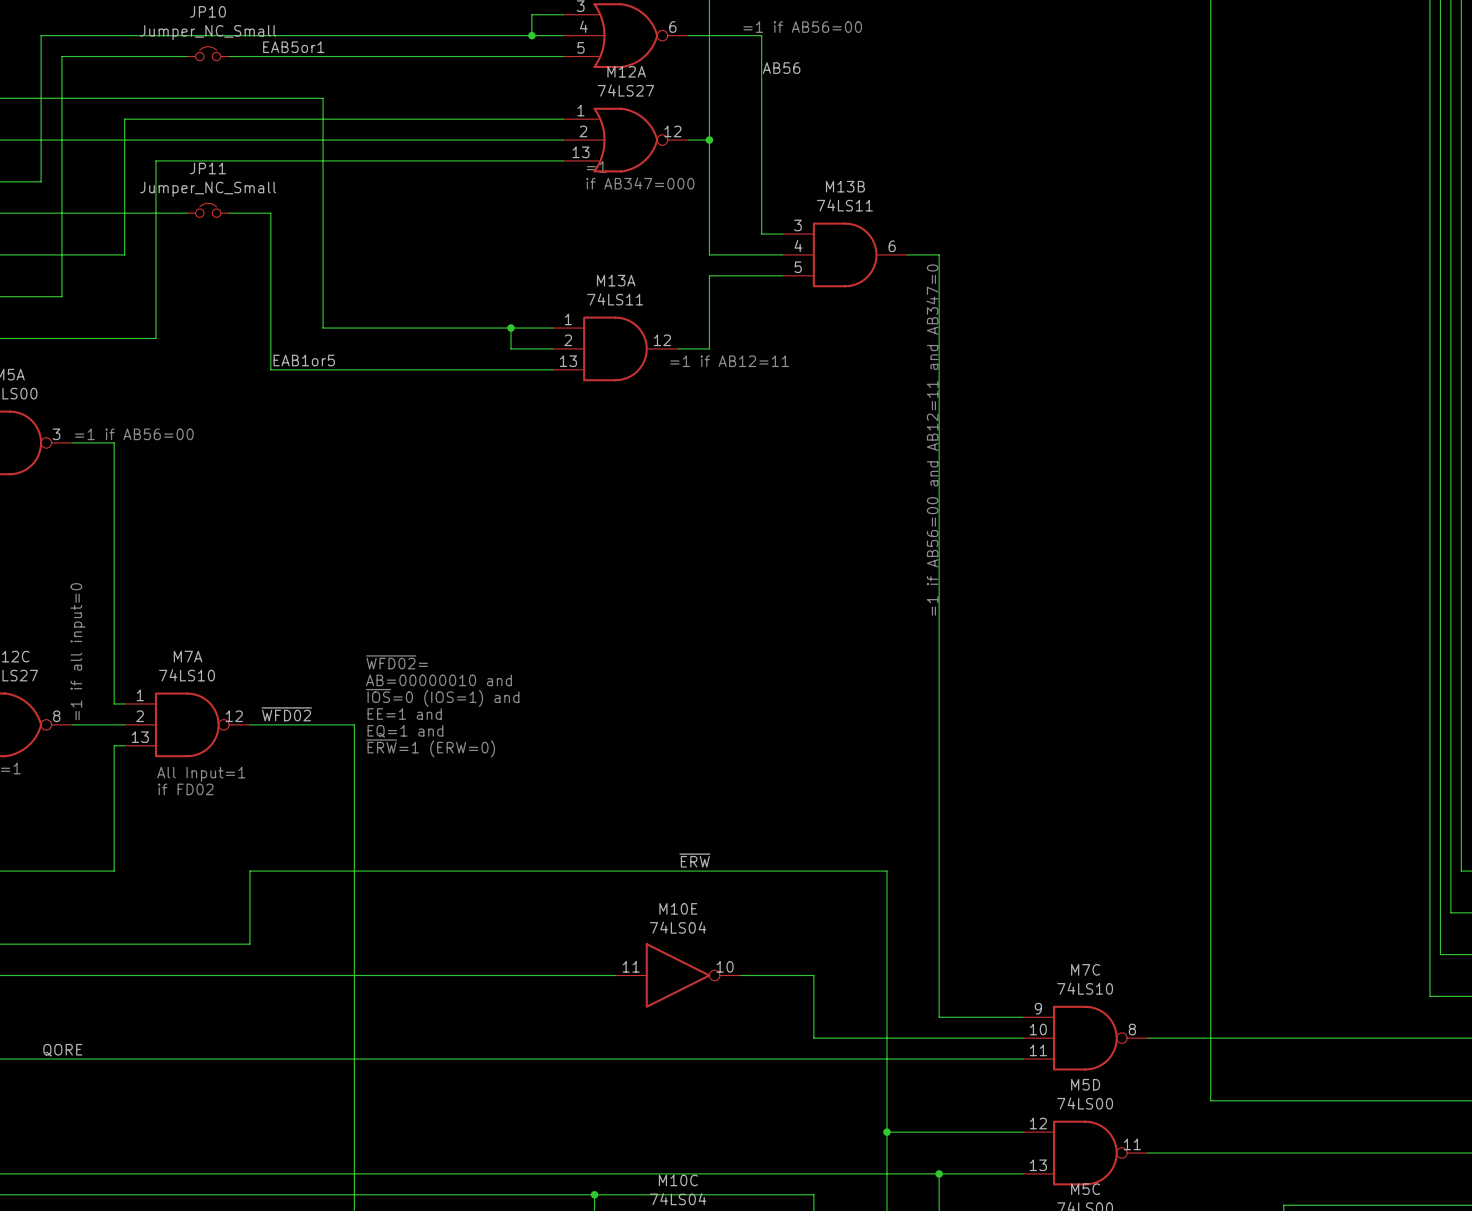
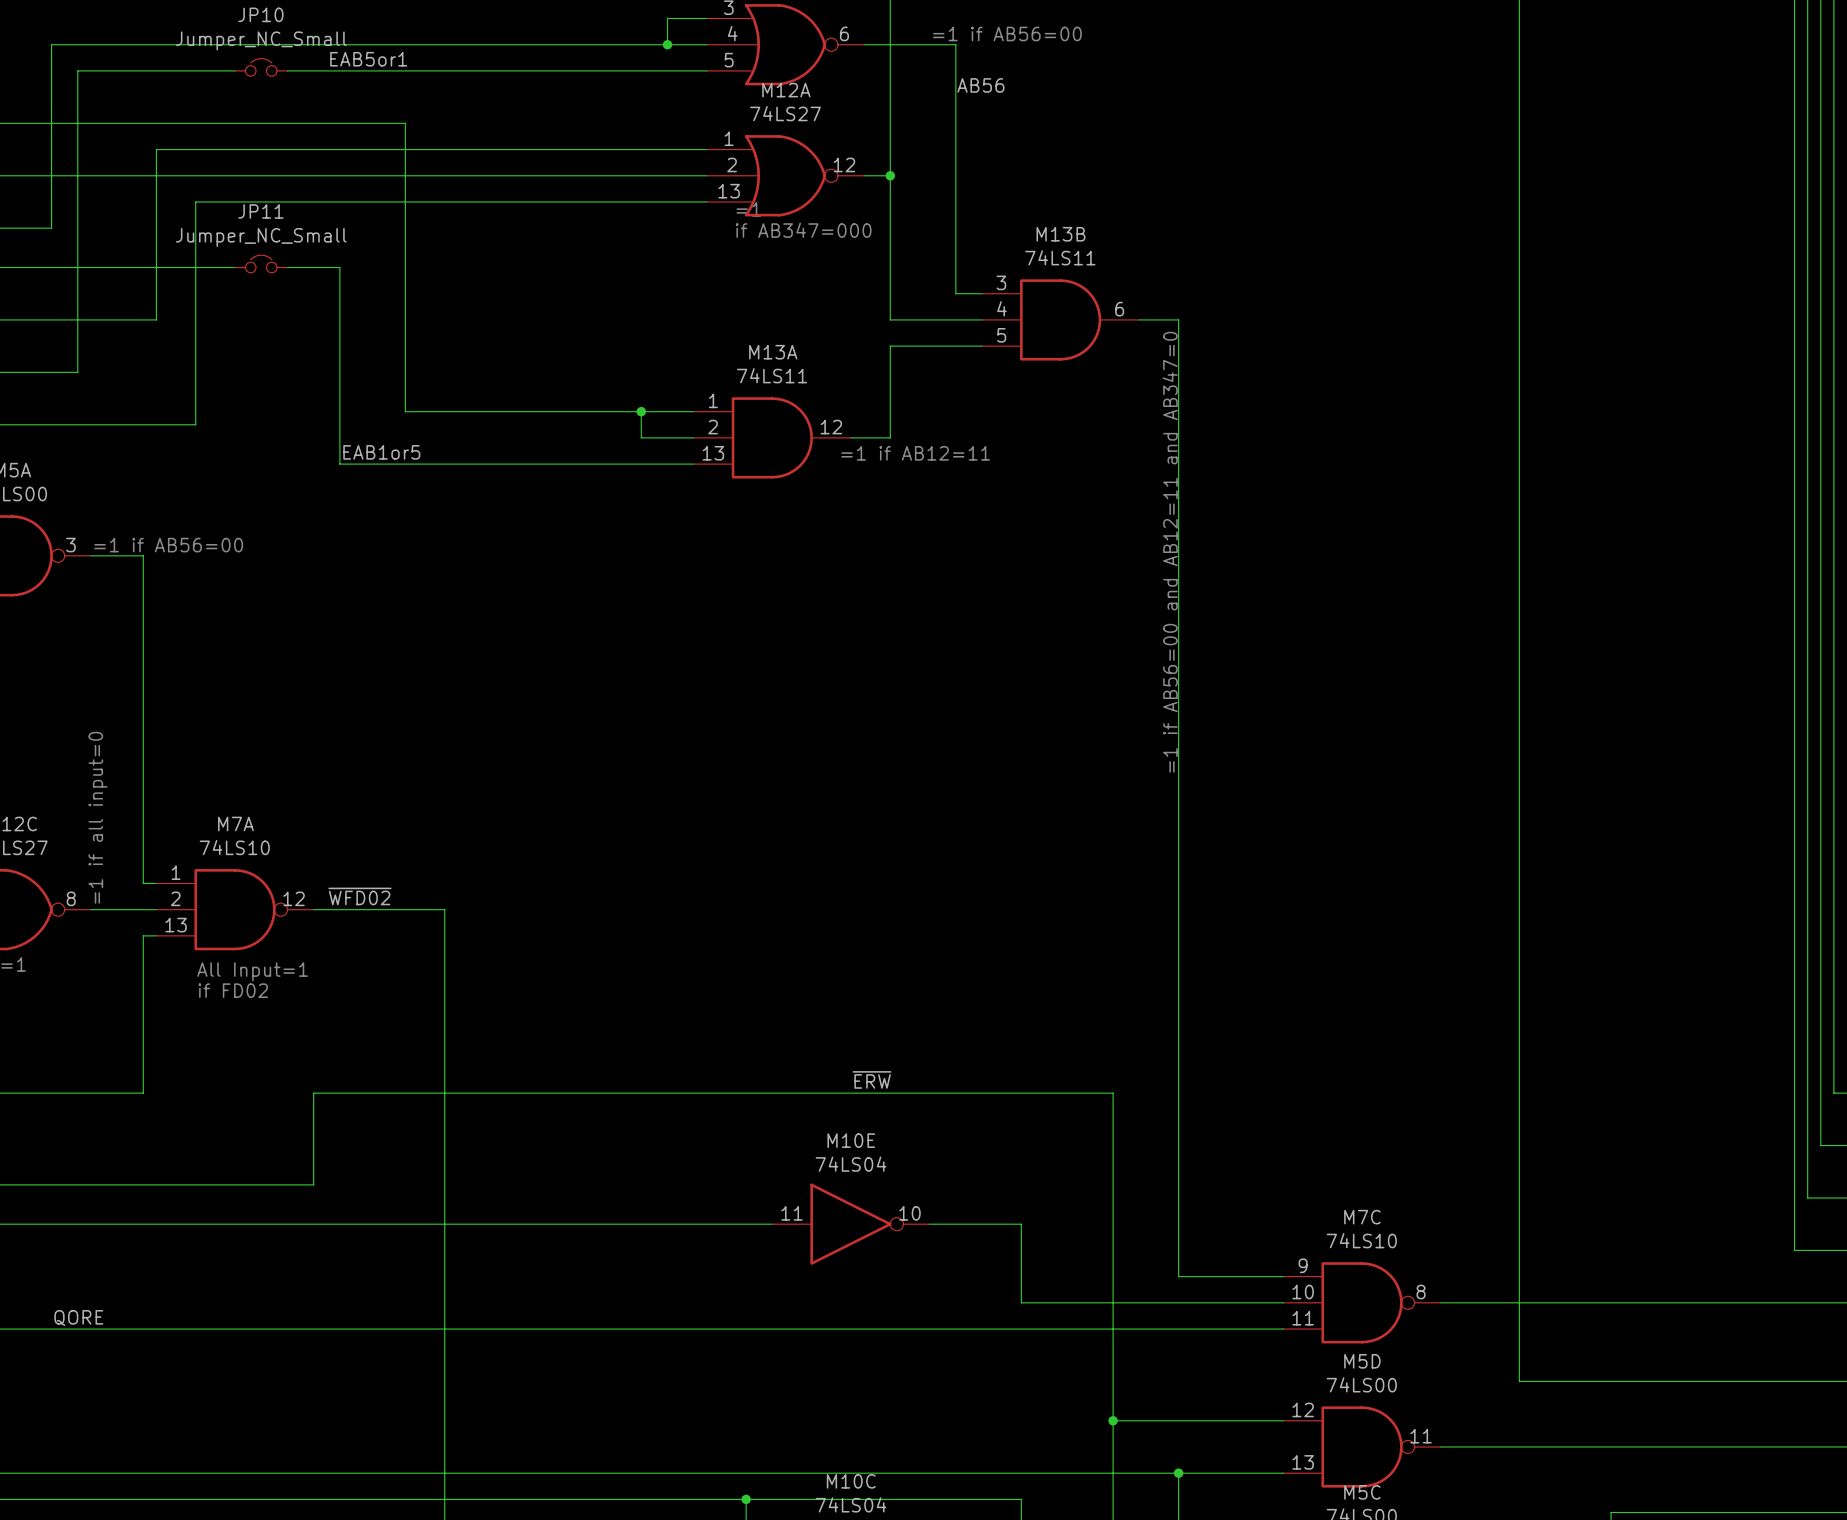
text: ~{WFD02}= (396, 662) -> none
text: AB=00000010 and (438, 680) -> none
text: ~{IOS}=0 (IOS=1) and (442, 697) -> none
text: EE=1 and (404, 714) -> none
text: EQ=1 and (405, 731) -> none
text: ~{ERW}=1 (ERW=0) (430, 748) -> none

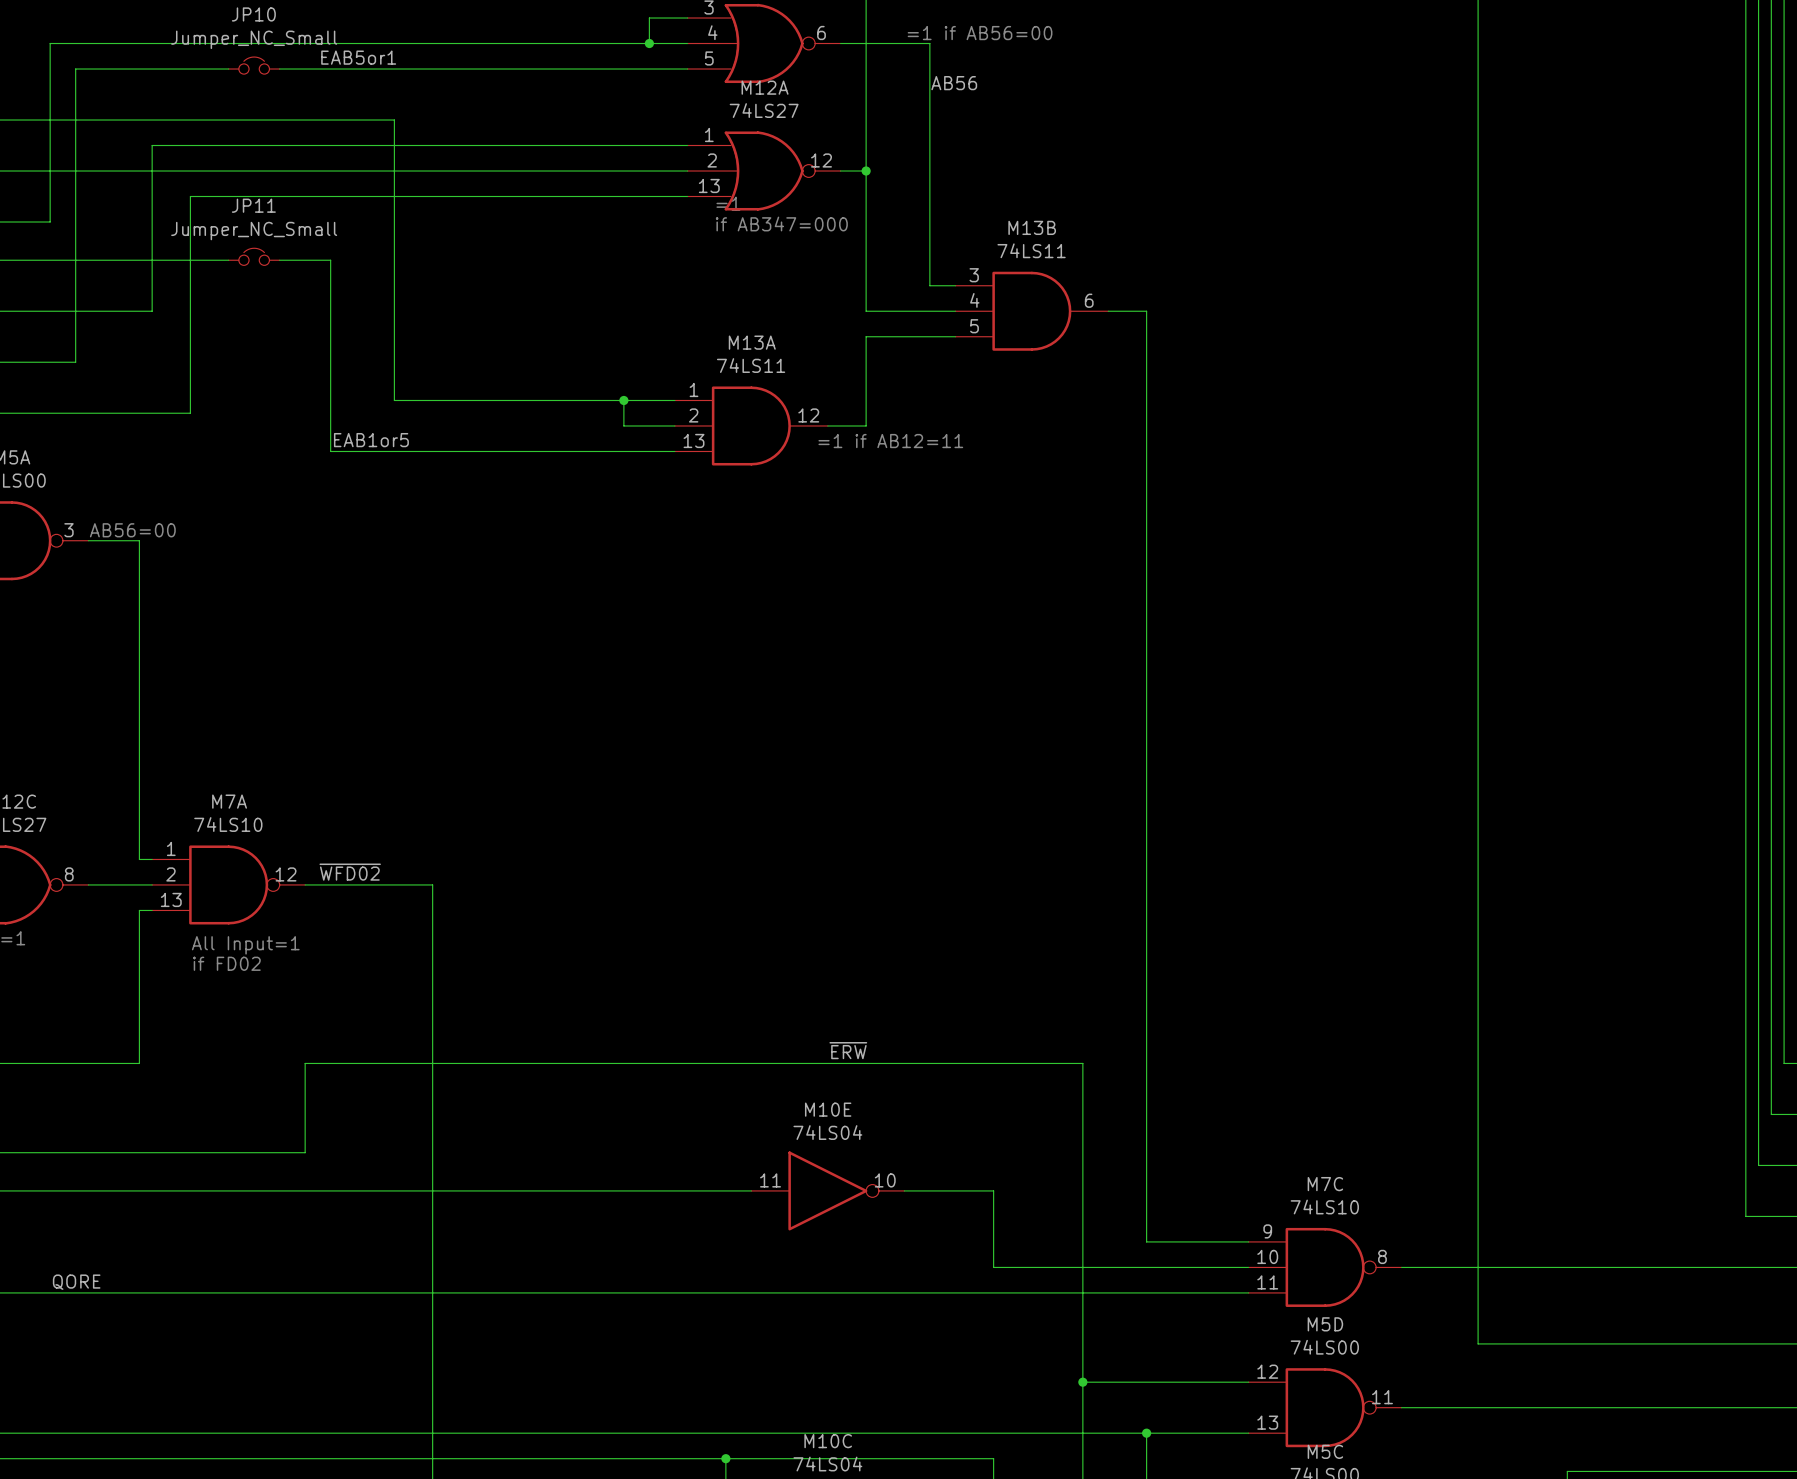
text: =1 if AB56=00 (168, 545) -> AB56=00 (132, 530)
text: =1 if AB56=00 and AB12=11 and AB347=0 (1170, 552) -> none
text: =1 if all input=0 (98, 817) -> none

